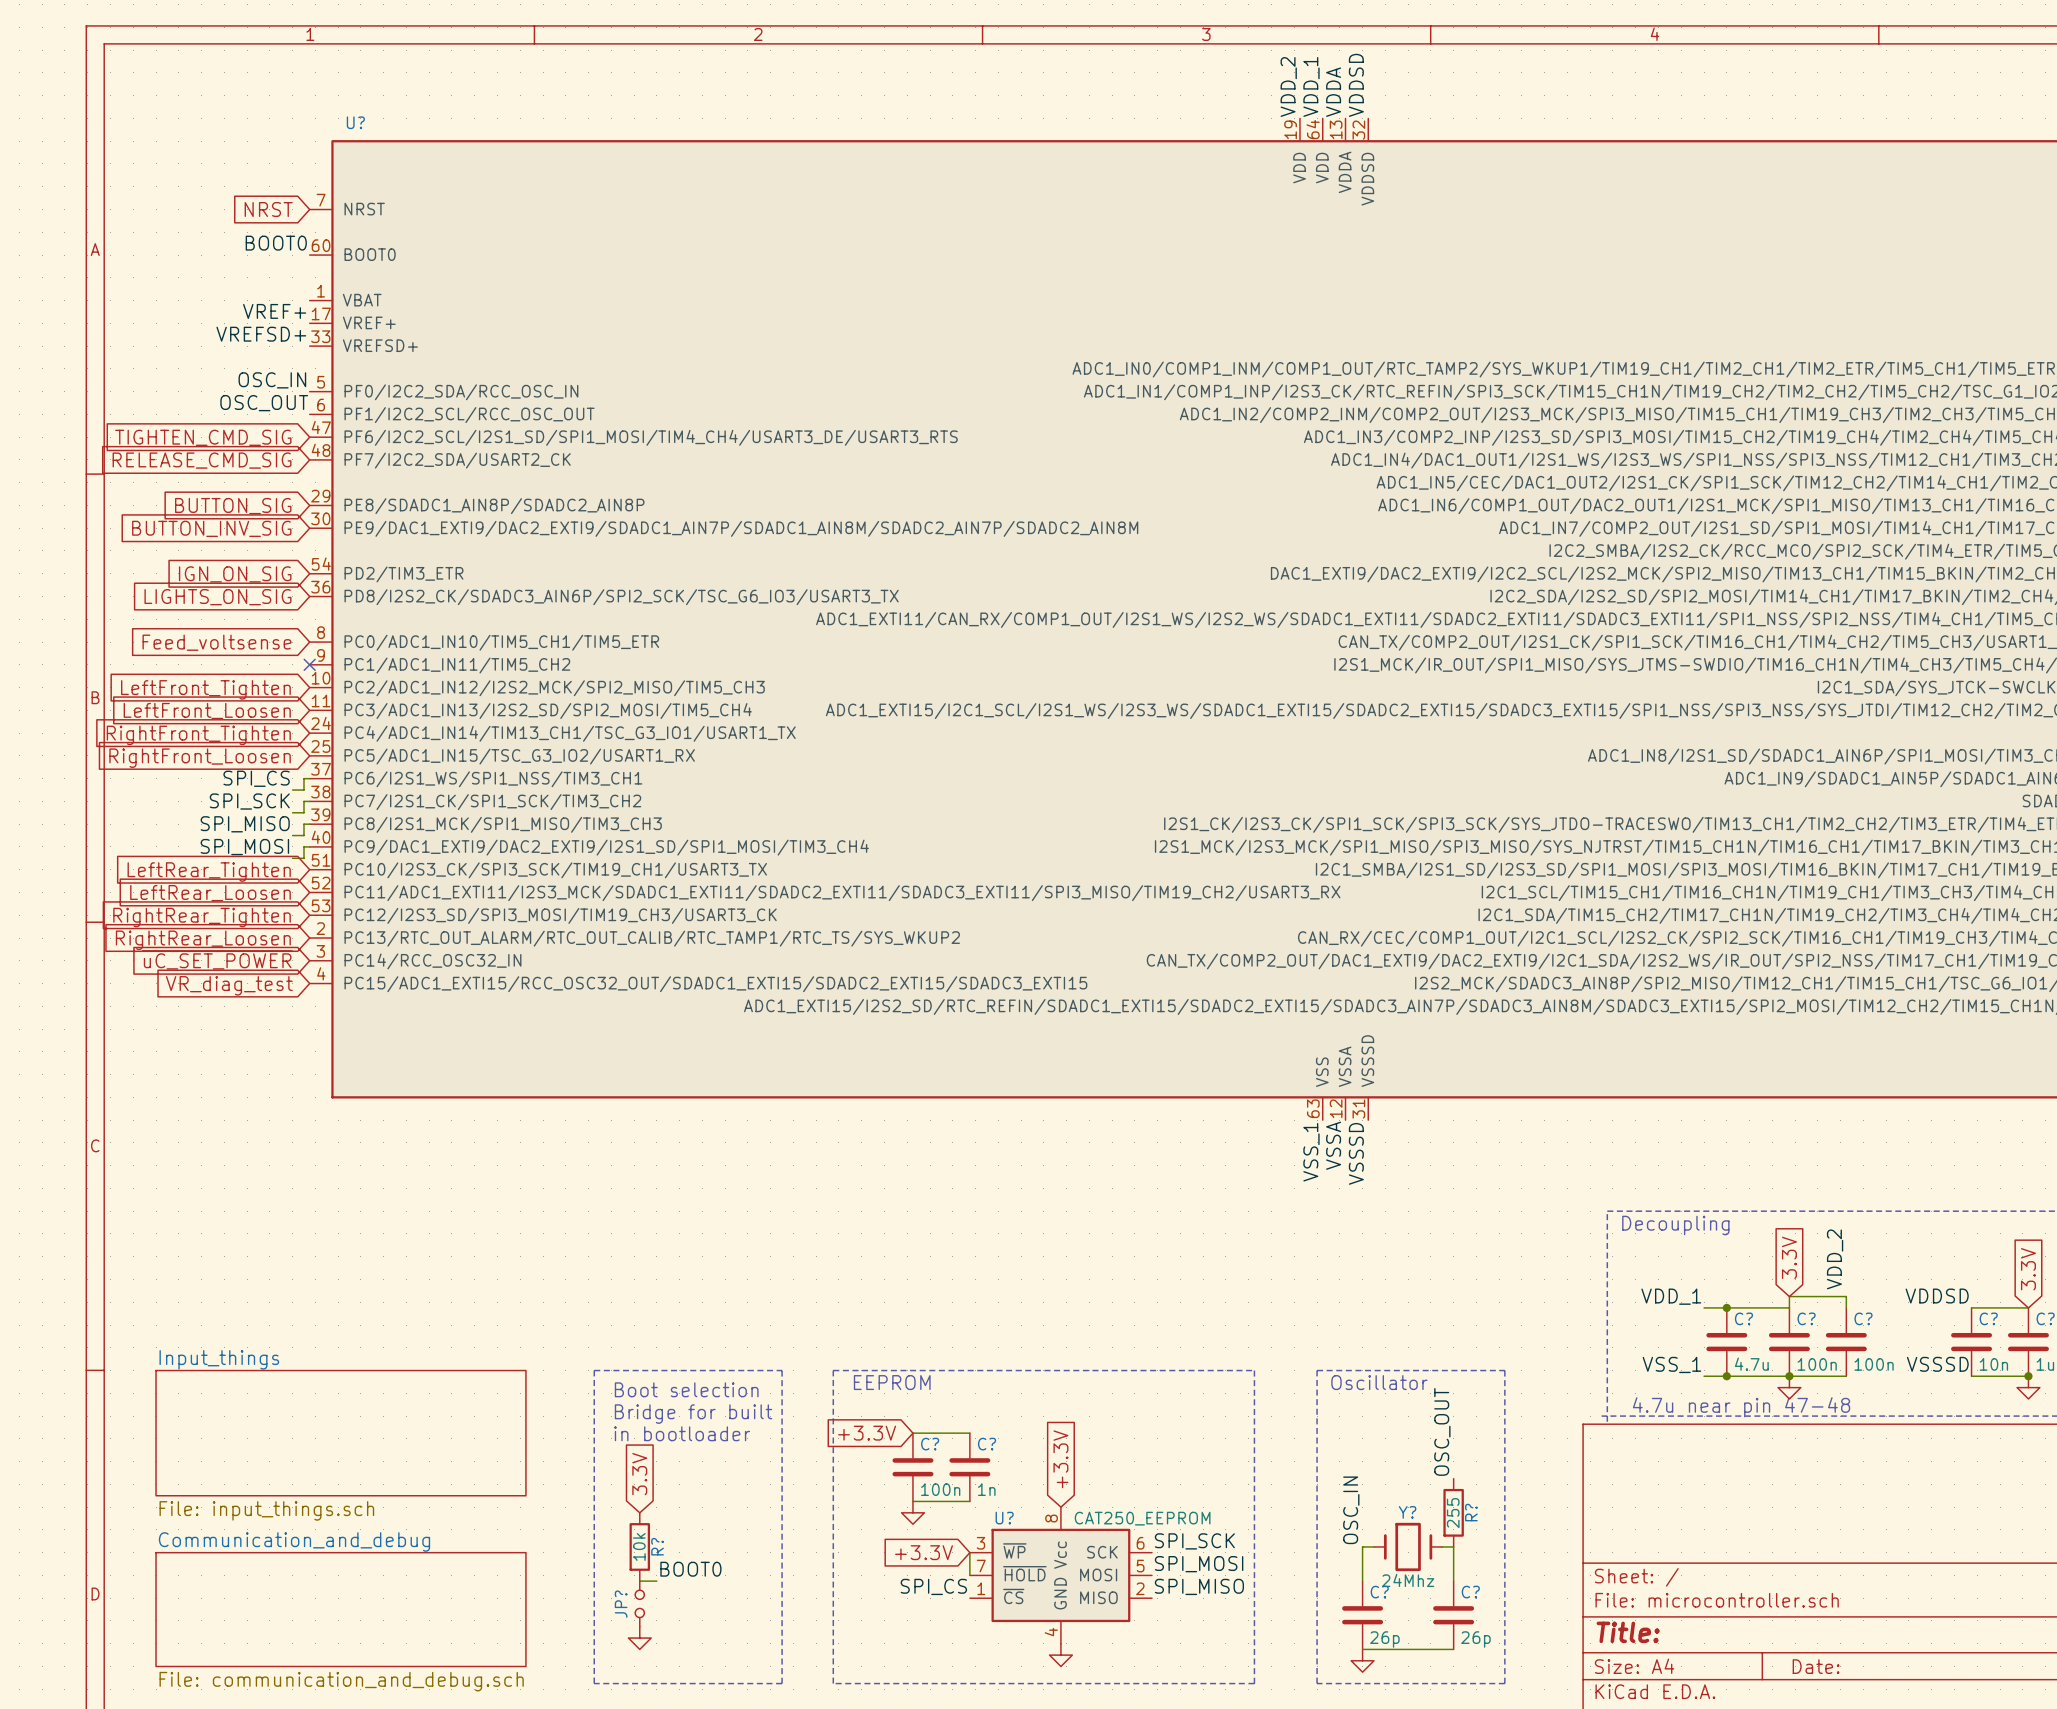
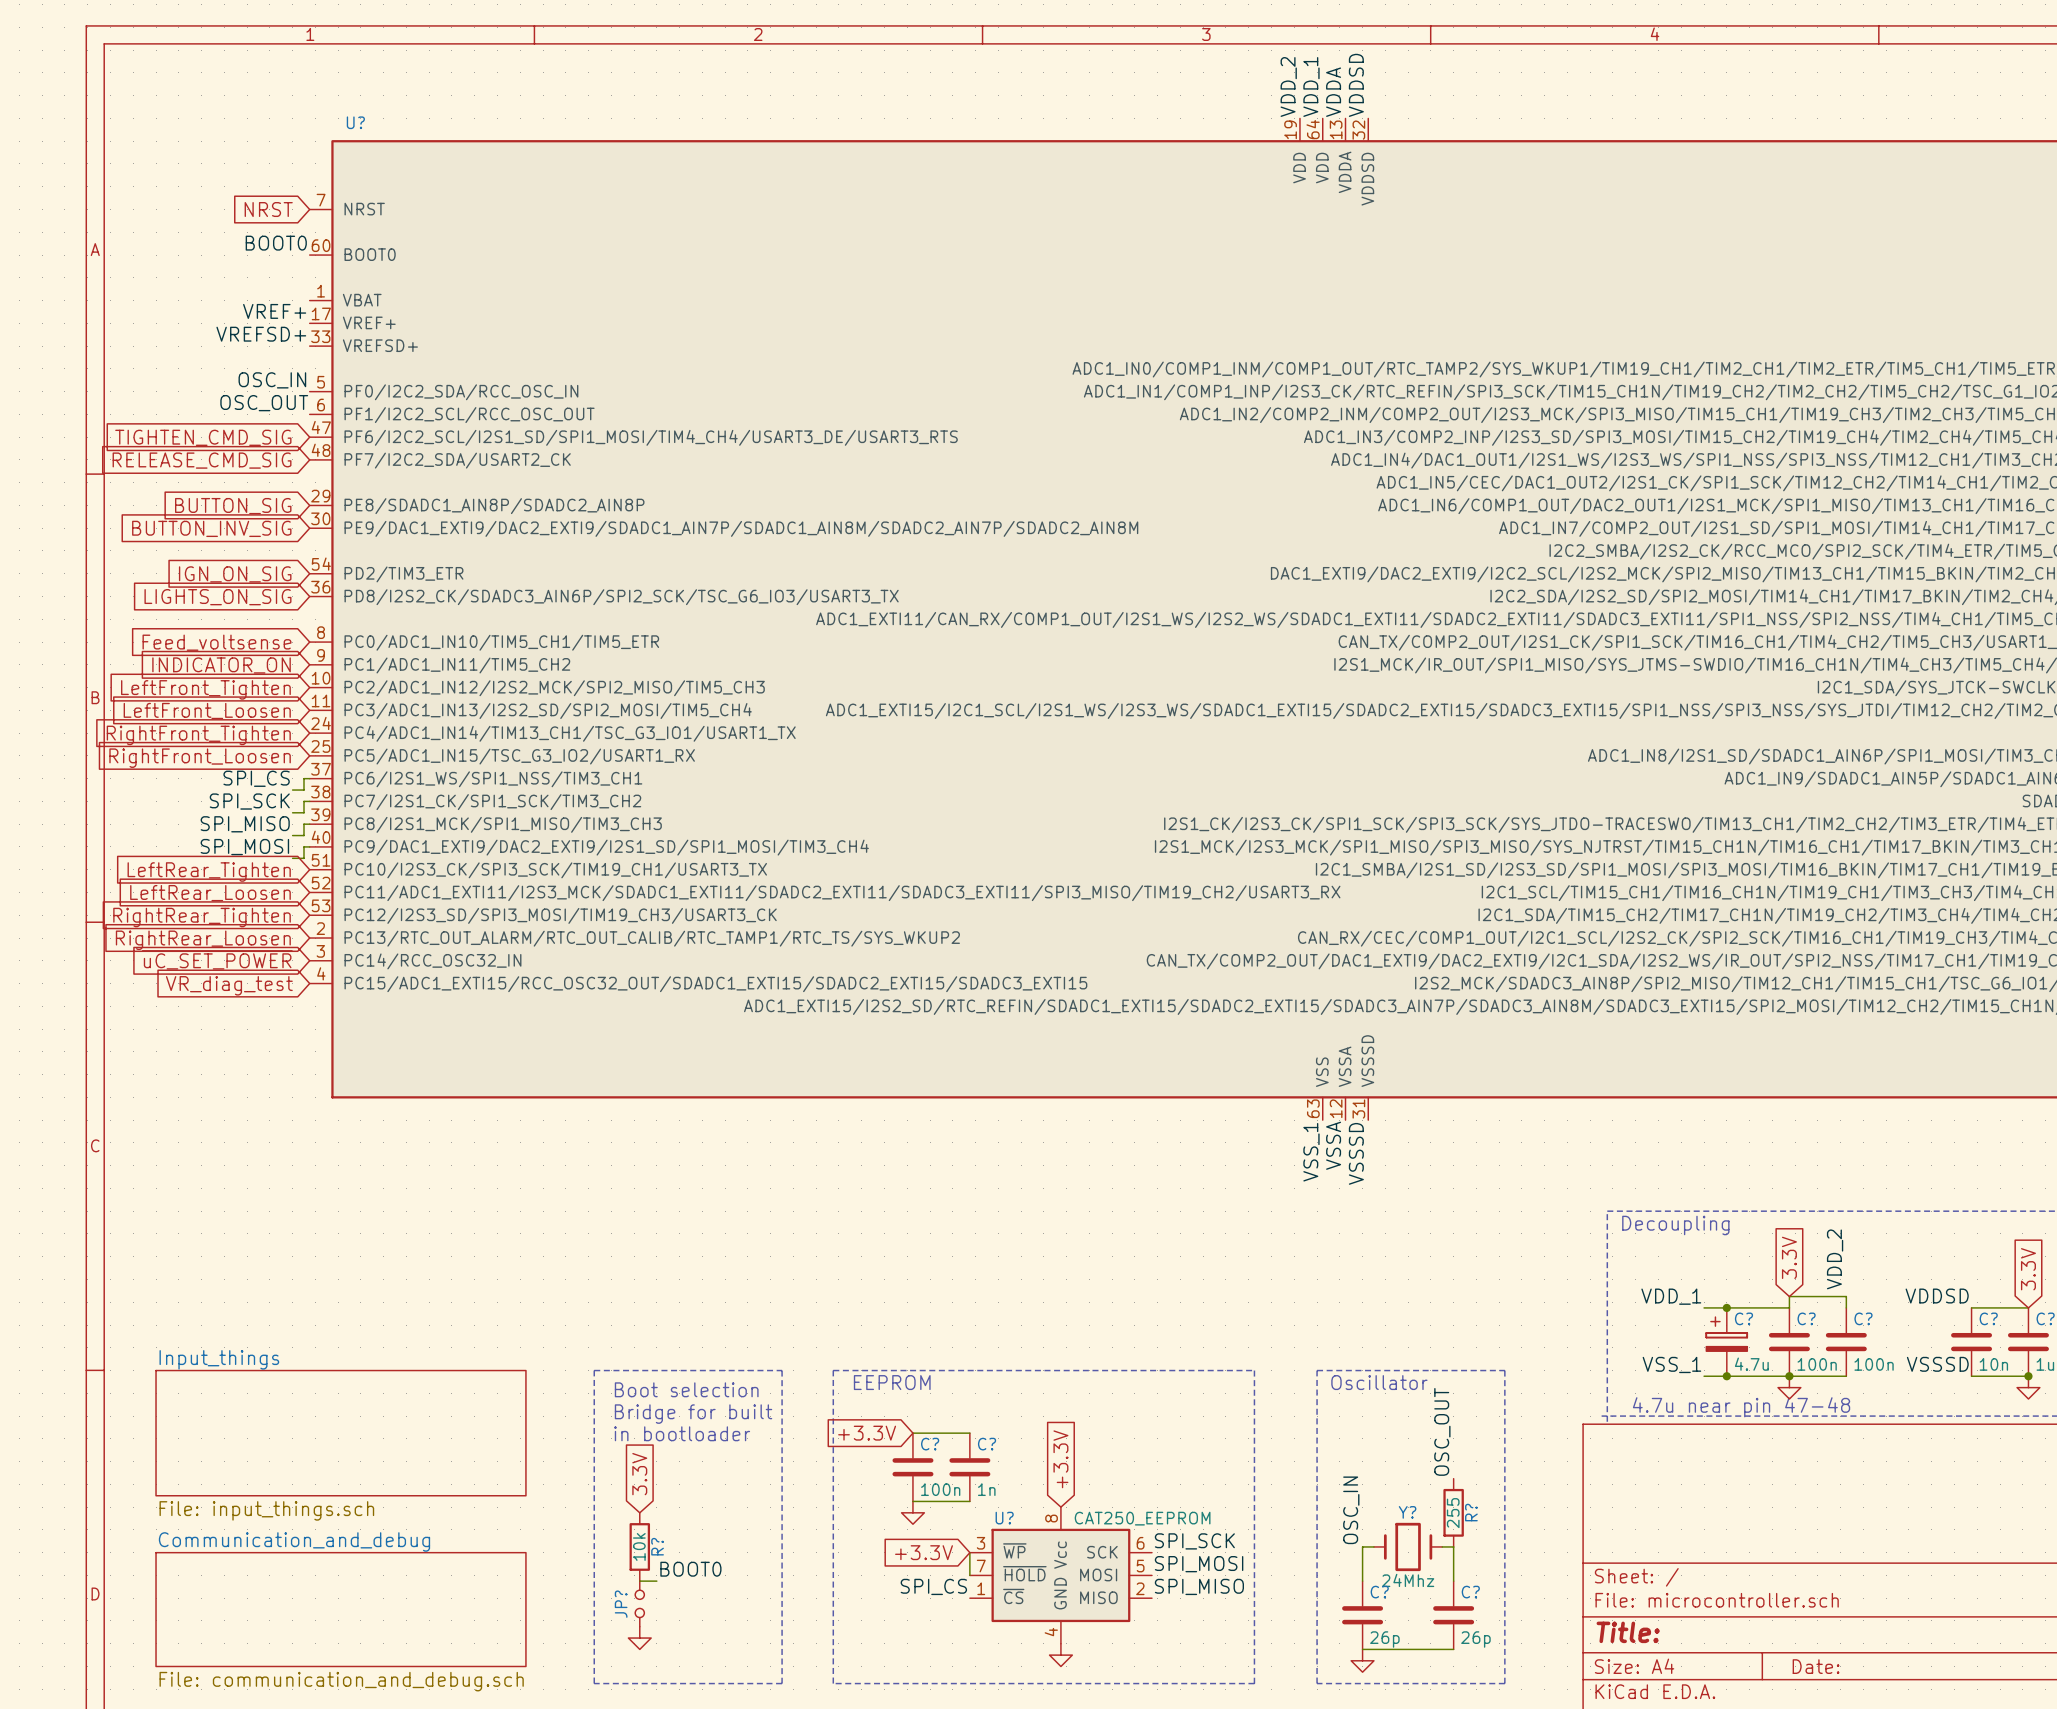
no-connect mark: (309, 664) -> none
global label: none -> INDICATOR_ON (221, 665)
C? symbol: [1706, 1307, 1748, 1377] -> [1706, 1307, 1748, 1377]

